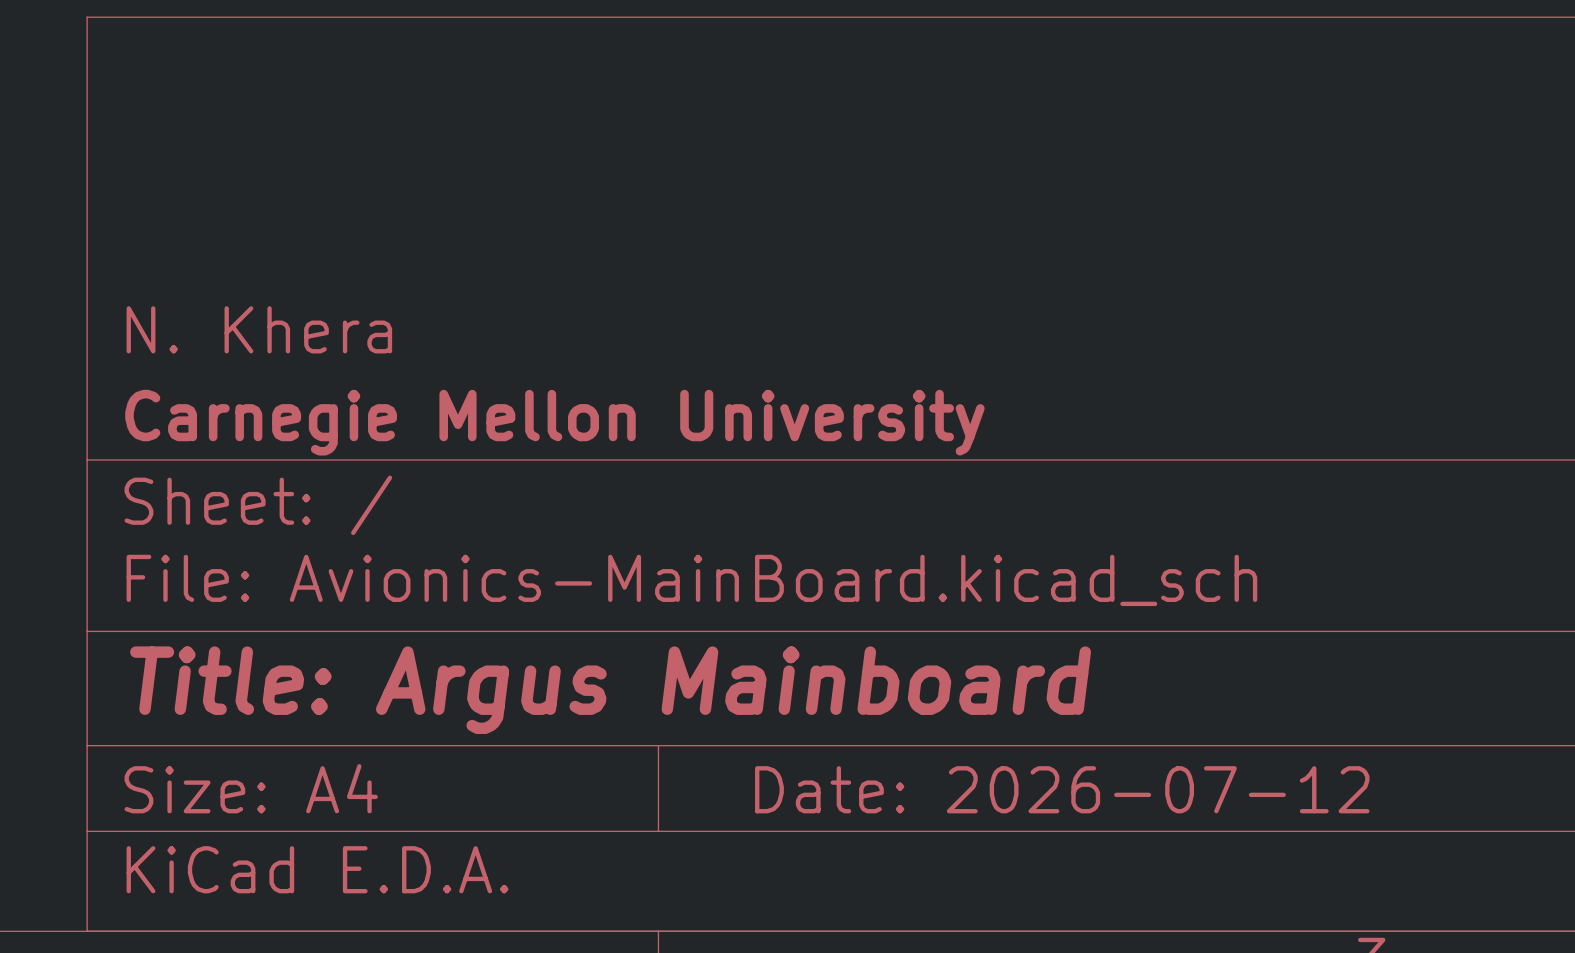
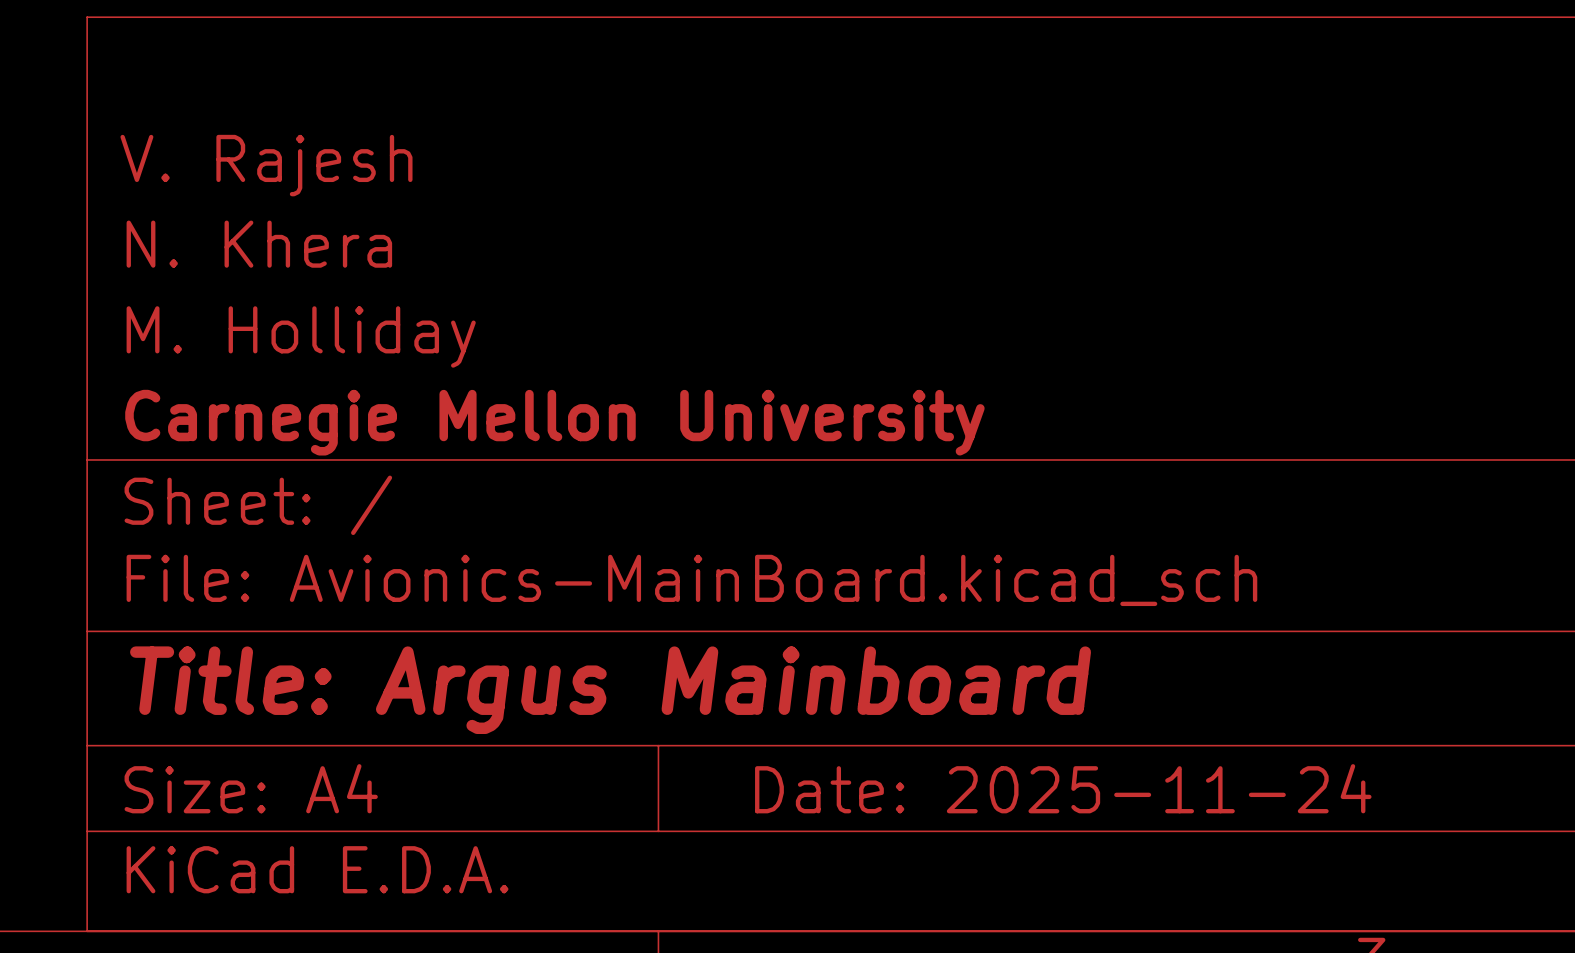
title block: none -> V. Rajesh (266, 165)
title block: none -> N. Khera (259, 244)
title block: N. Khera (259, 329) -> M. Holliday (301, 336)
title block: Date: 2026-07-12 (1062, 789) -> Date: 2025-11-24 (1063, 788)

